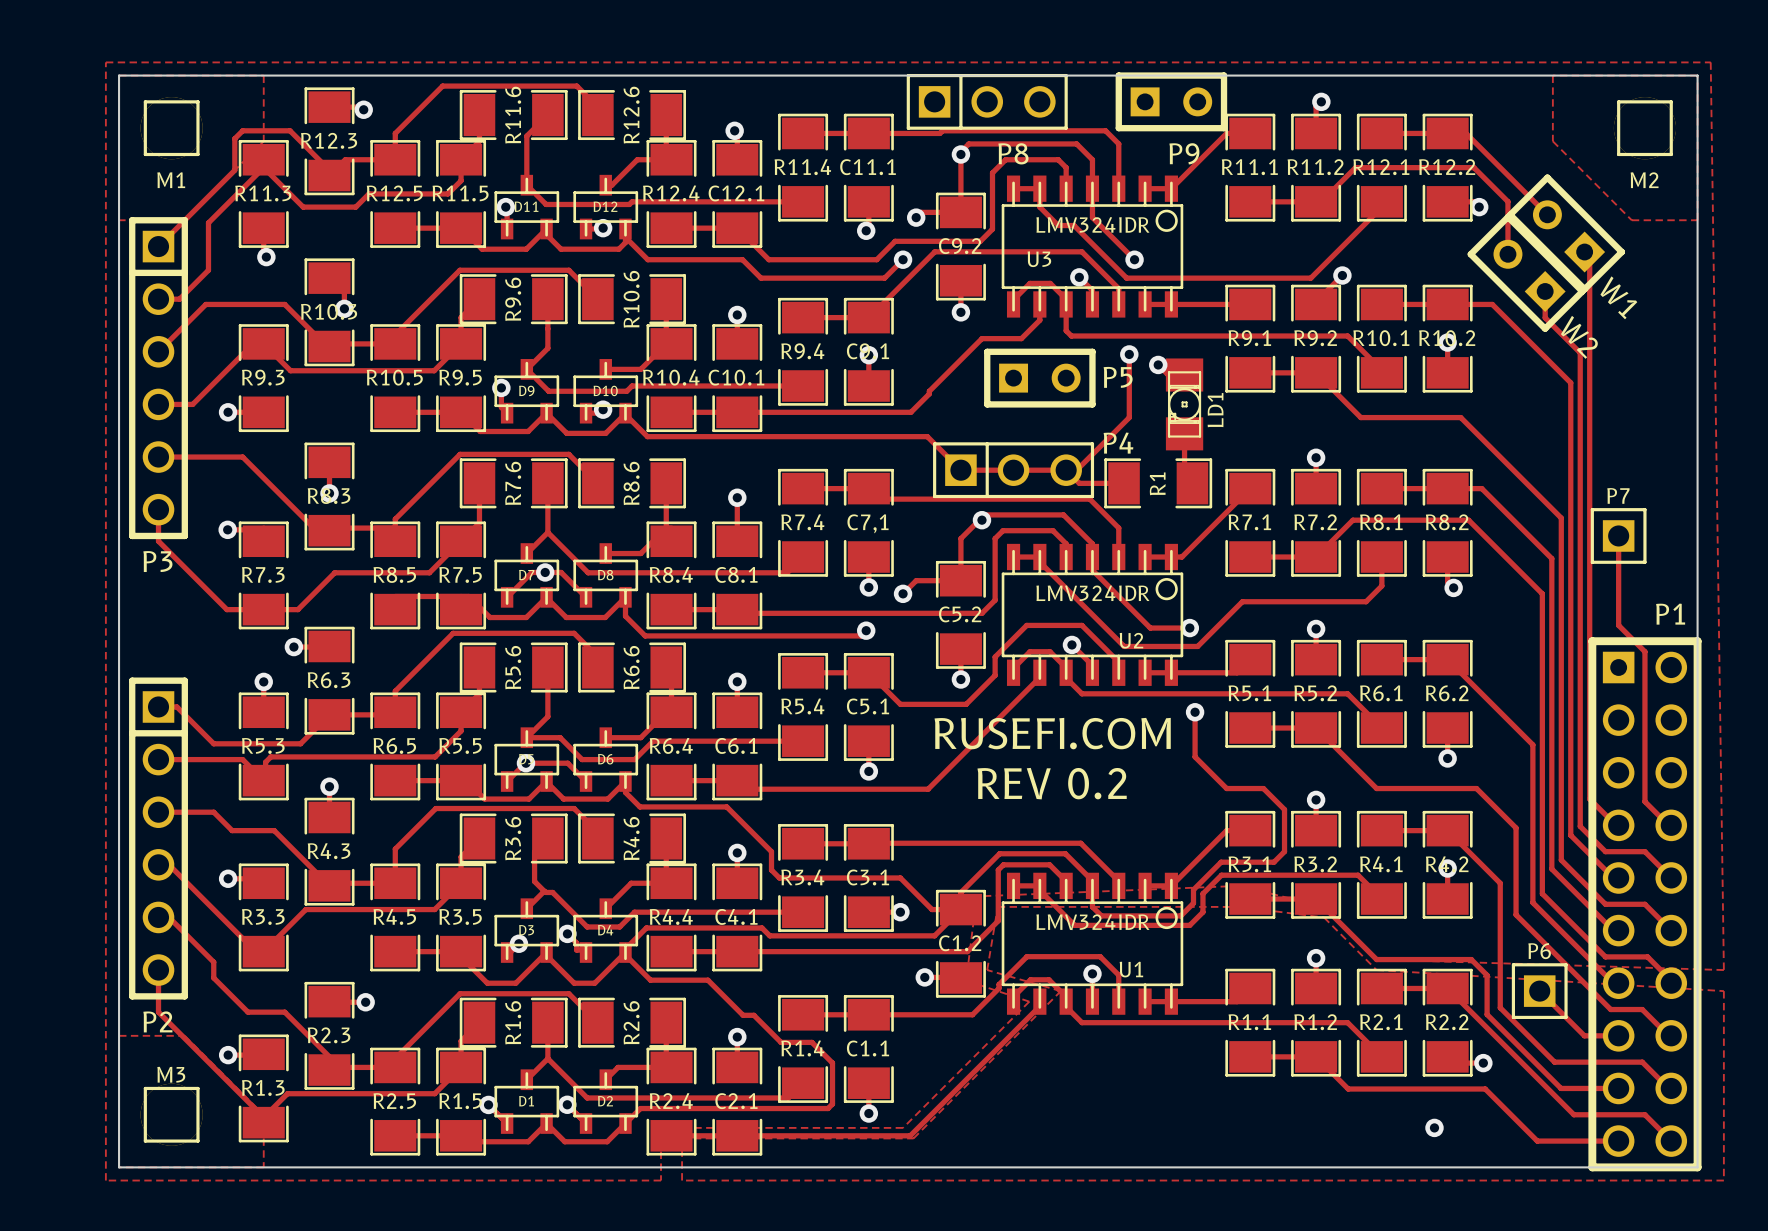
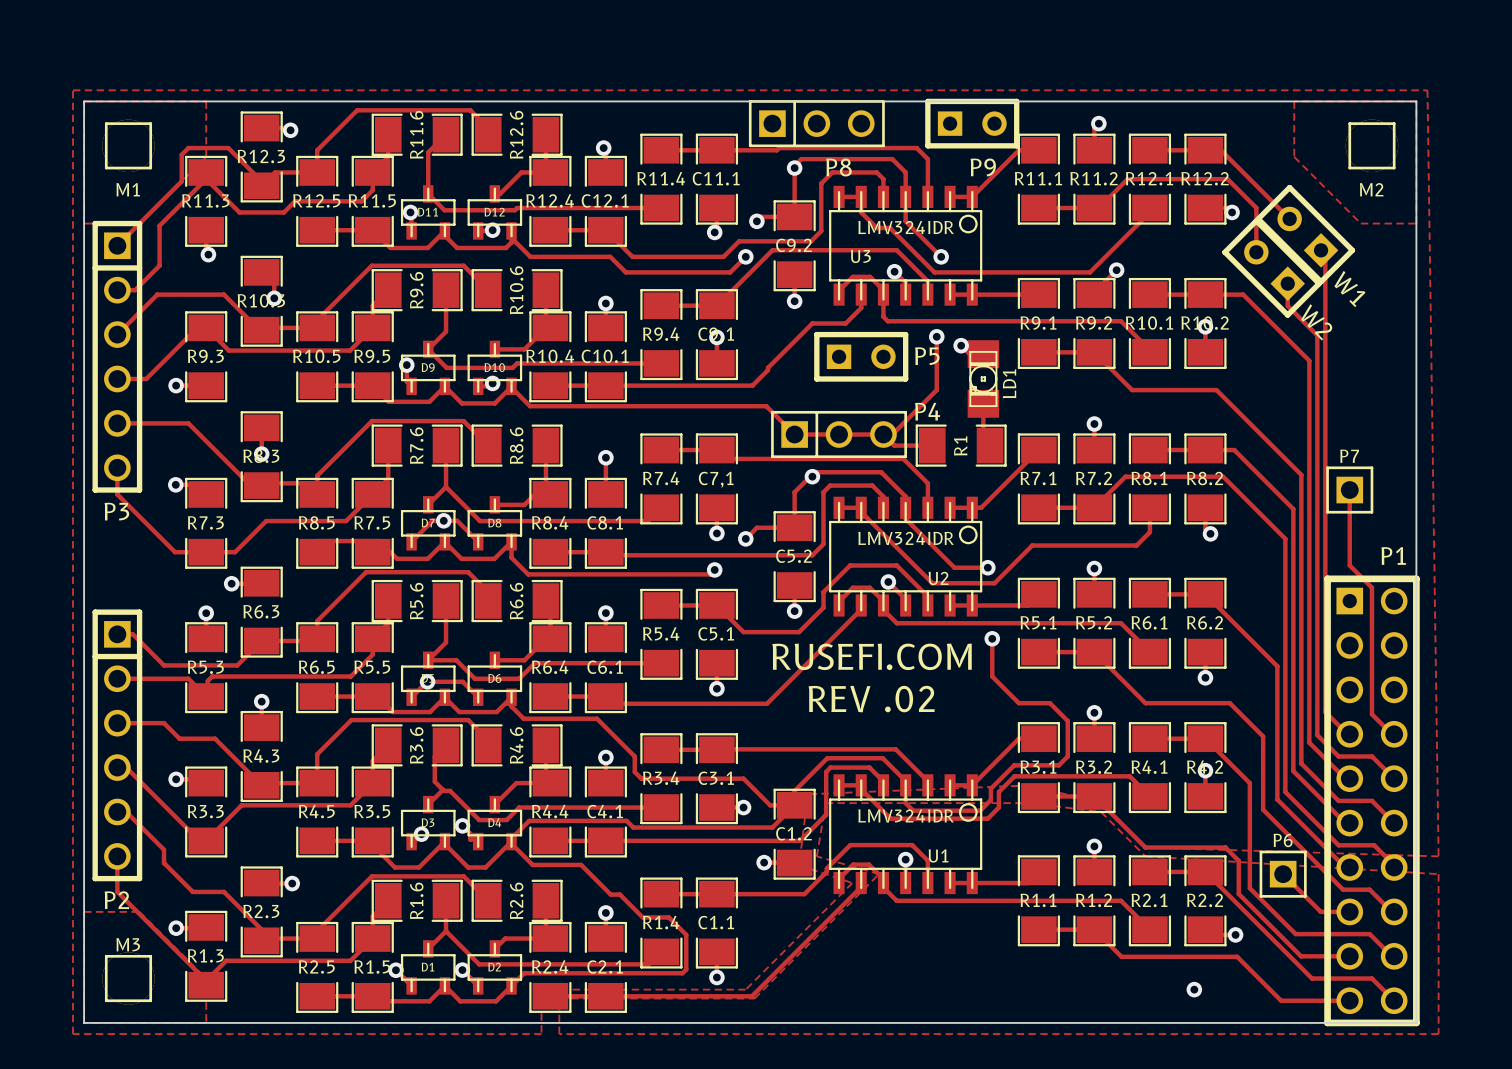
text: REV 0.2 (1052, 783) -> REV .02 (871, 699)

